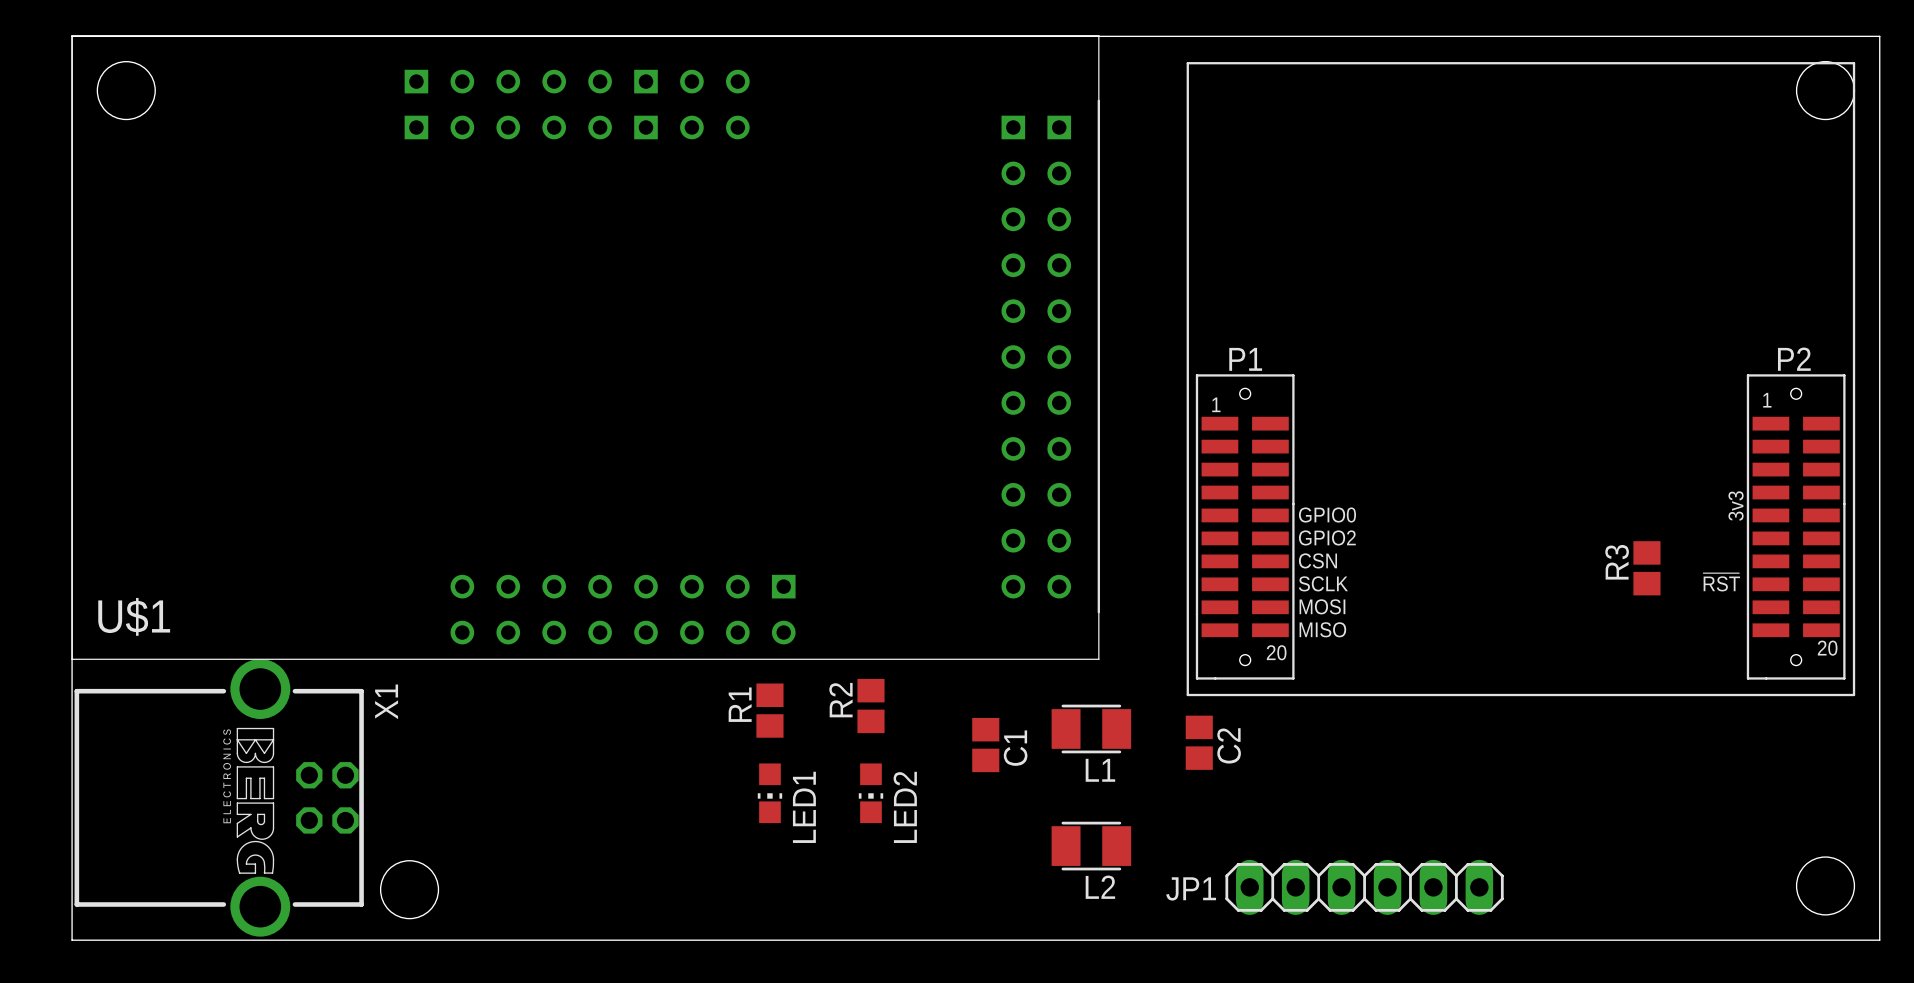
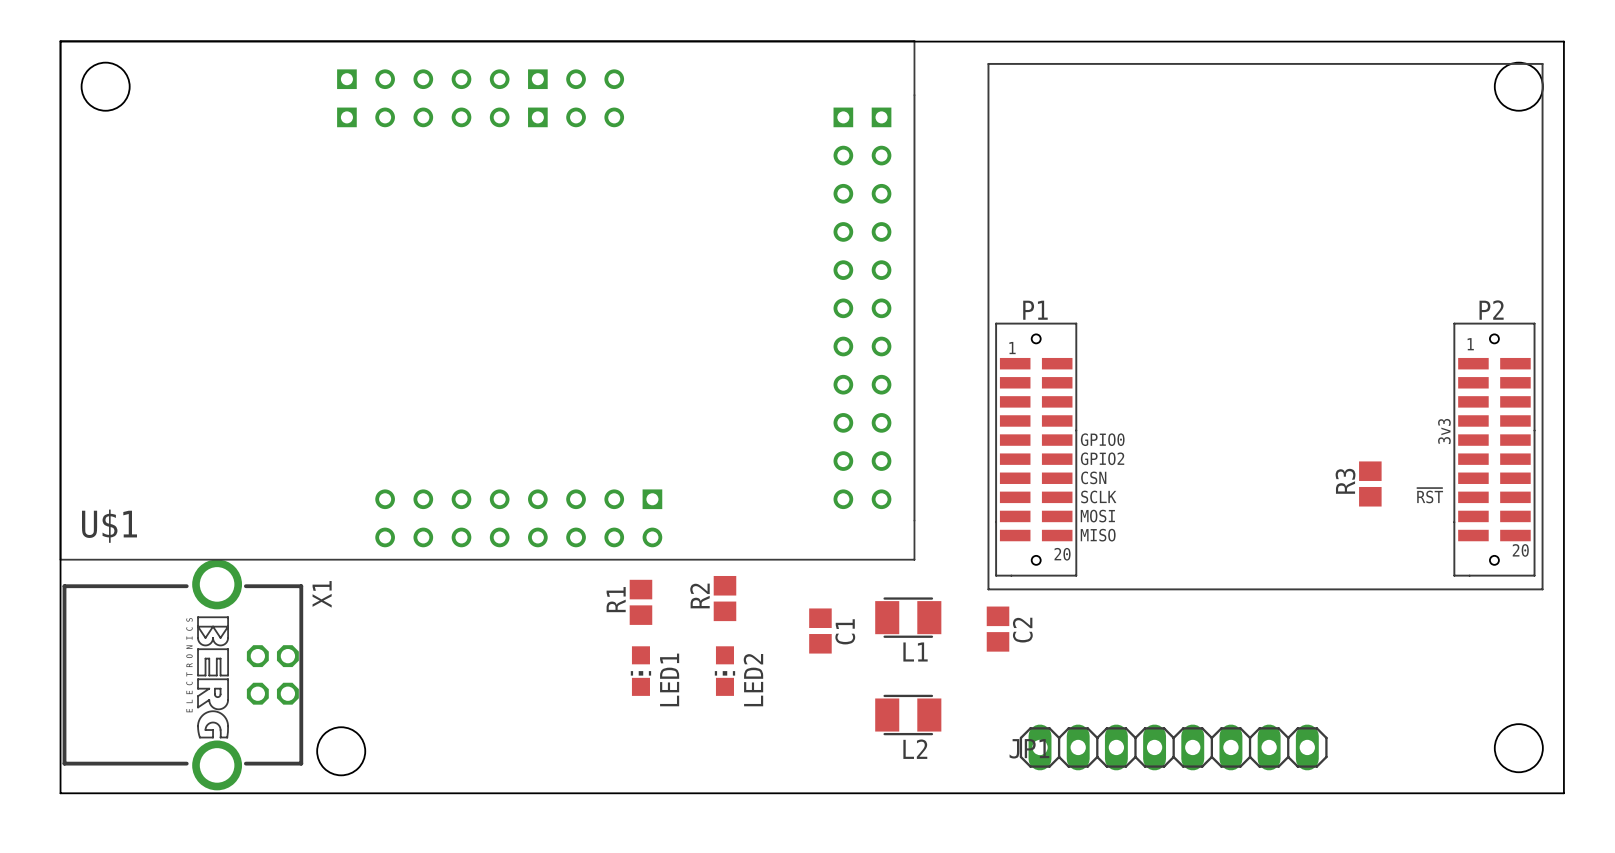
JP1 footprint: [1225, 859, 1504, 915] -> [1019, 724, 1328, 771]

